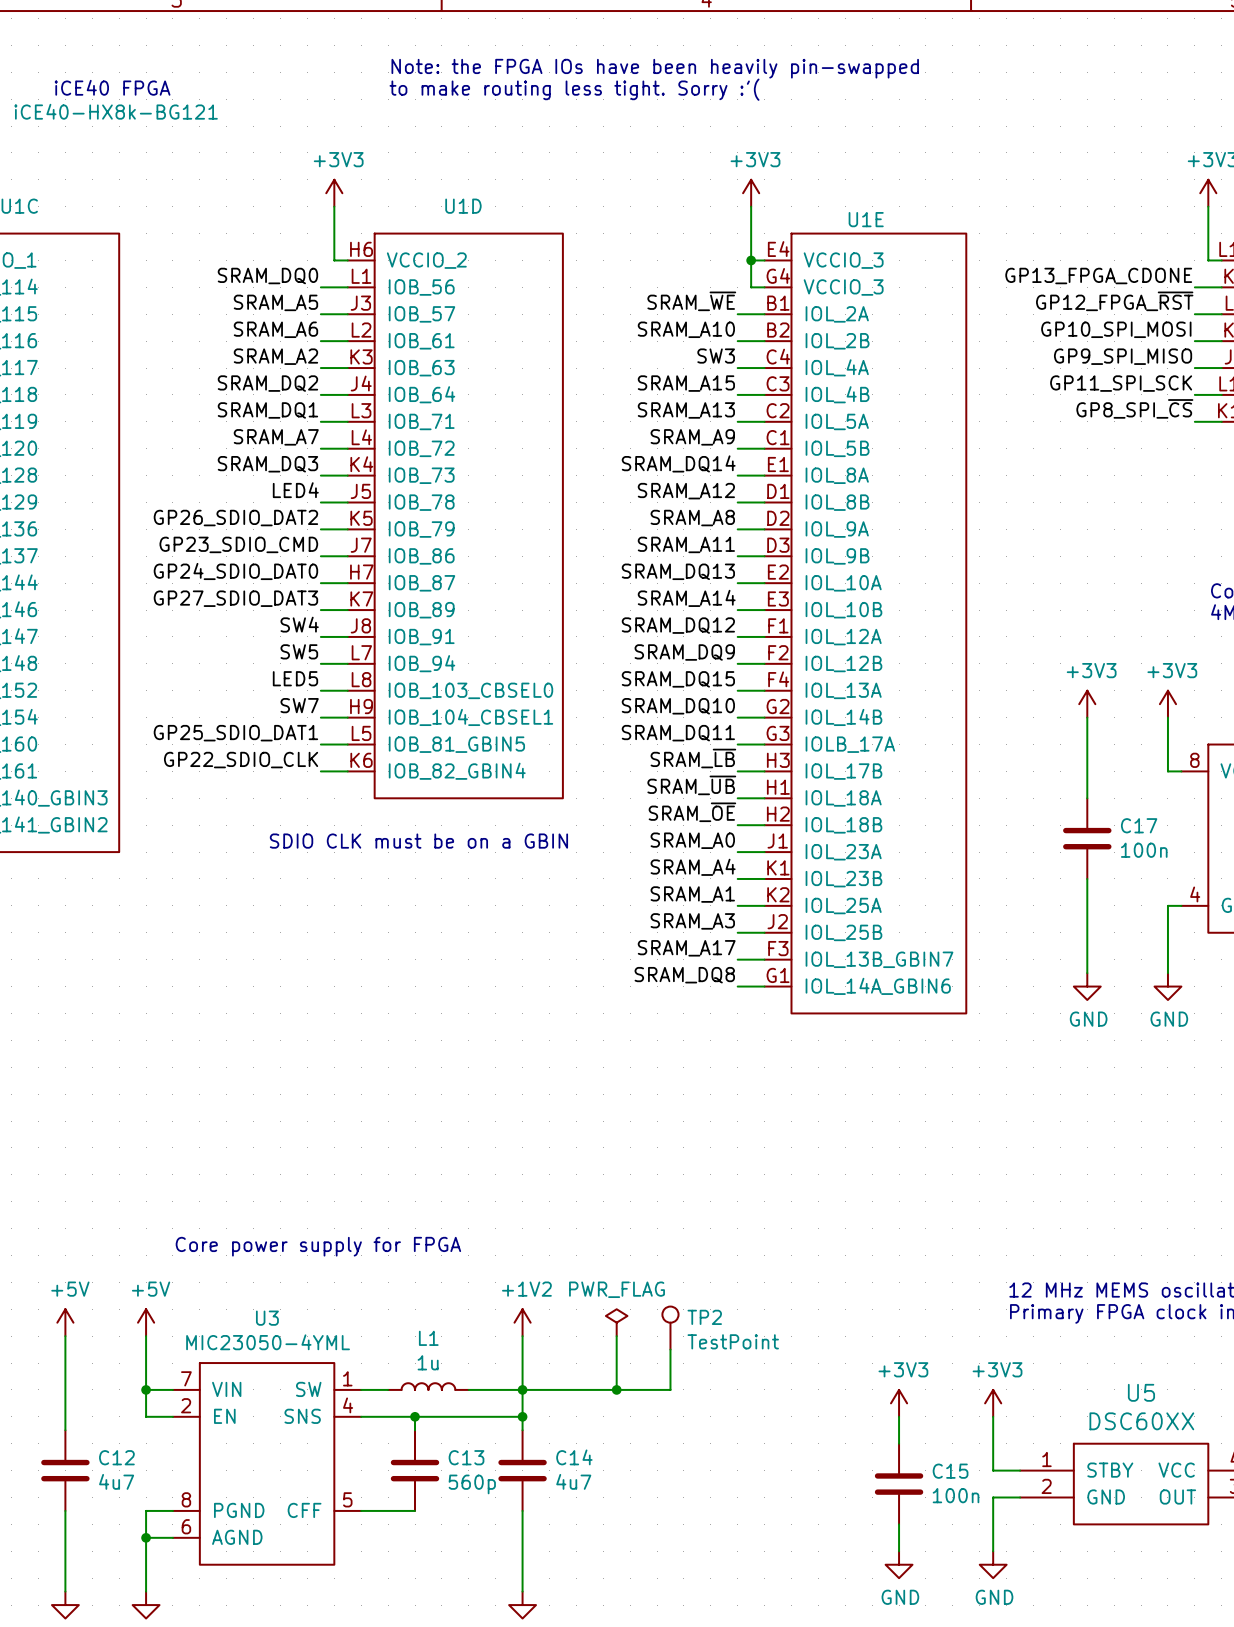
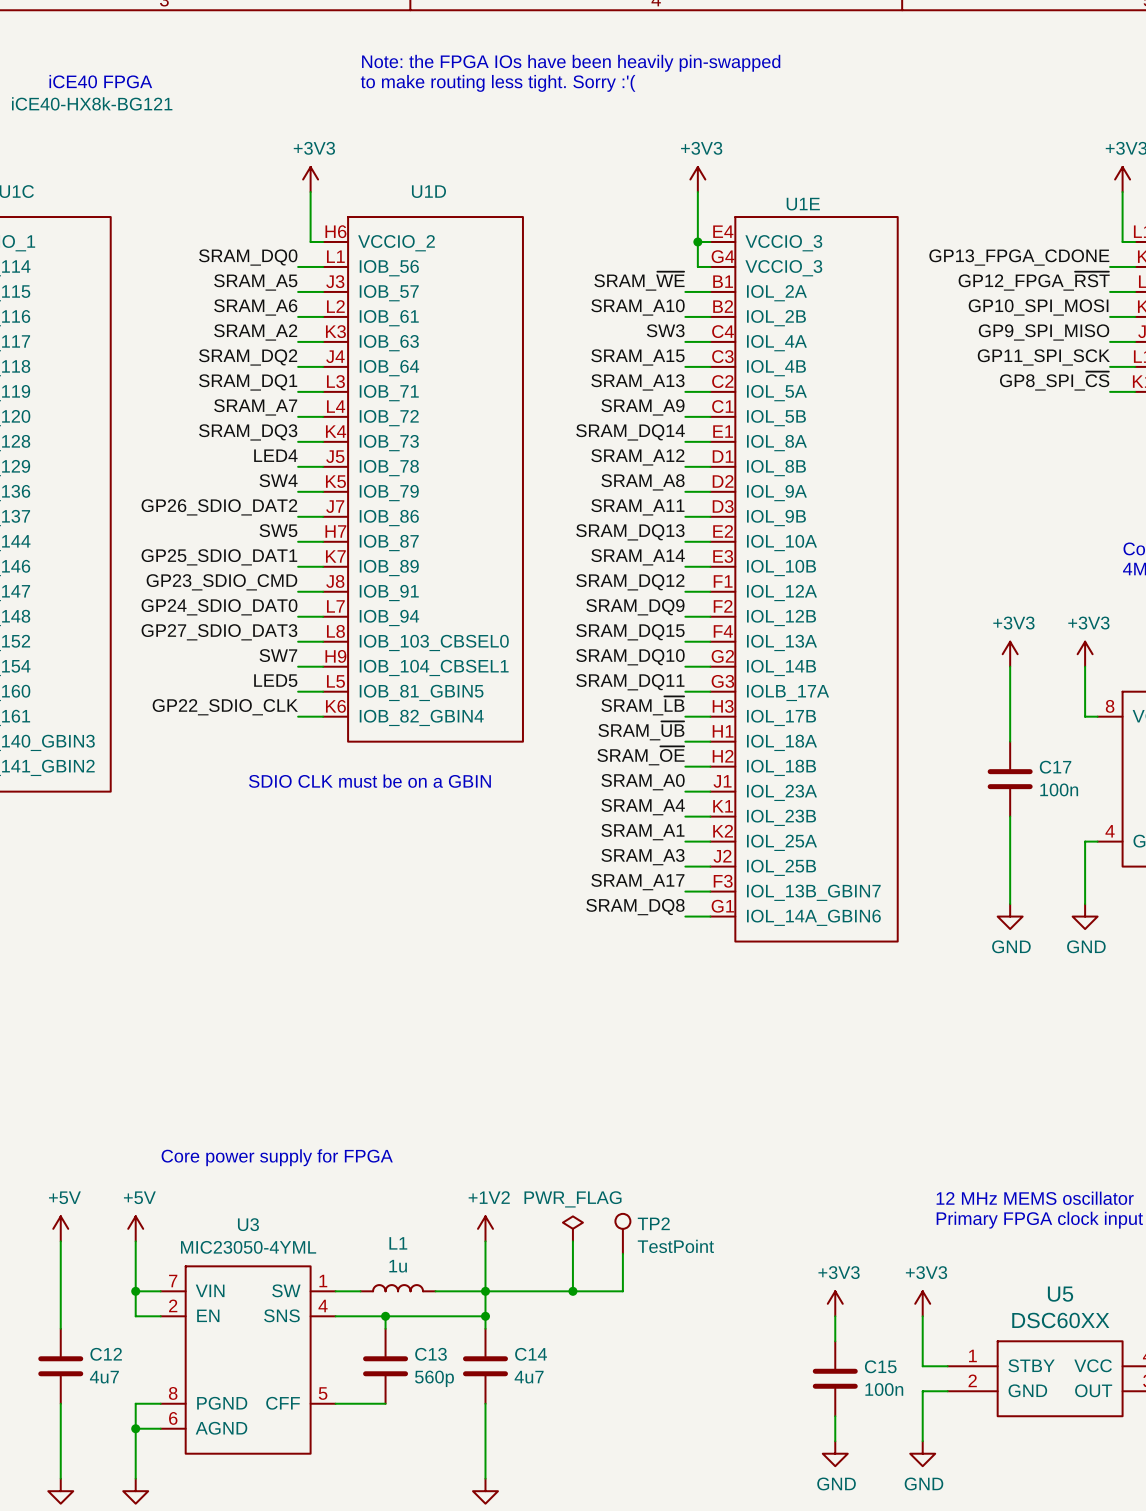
label: GP26_SDIO_DAT2 (235, 518) -> SW4 (278, 480)
label: GP23_SDIO_CMD (238, 544) -> GP26_SDIO_DAT2 (219, 507)
label: GP24_SDIO_DAT0 (235, 571) -> SW5 (278, 530)
label: GP27_SDIO_DAT3 (235, 598) -> GP25_SDIO_DAT1 (219, 557)
label: SW4 (299, 624) -> GP23_SDIO_CMD (221, 582)
label: SW5 (299, 651) -> GP24_SDIO_DAT0 (219, 607)
label: LED5 (295, 678) -> GP27_SDIO_DAT3 (219, 632)
label: GP25_SDIO_DAT1 (235, 733) -> LED5 (275, 680)

